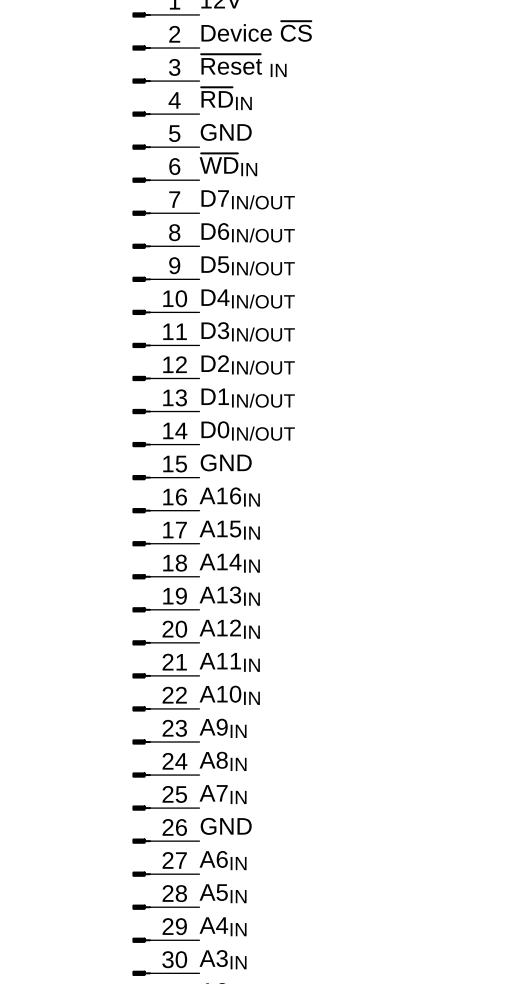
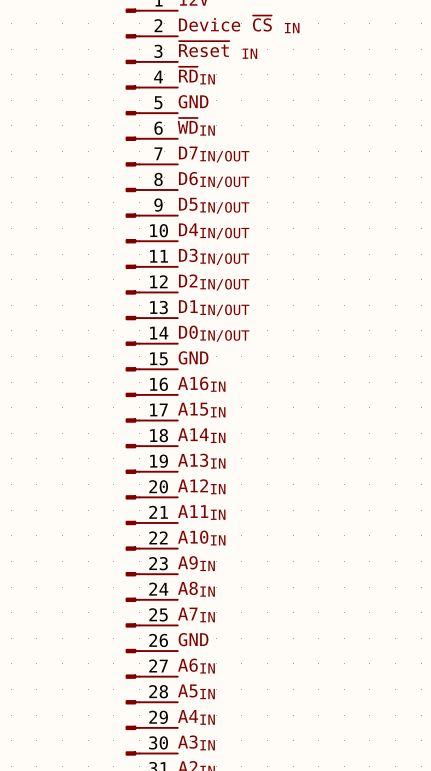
label: Device ~{CS} (256, 31) -> Device ~{CS} IN (239, 24)

